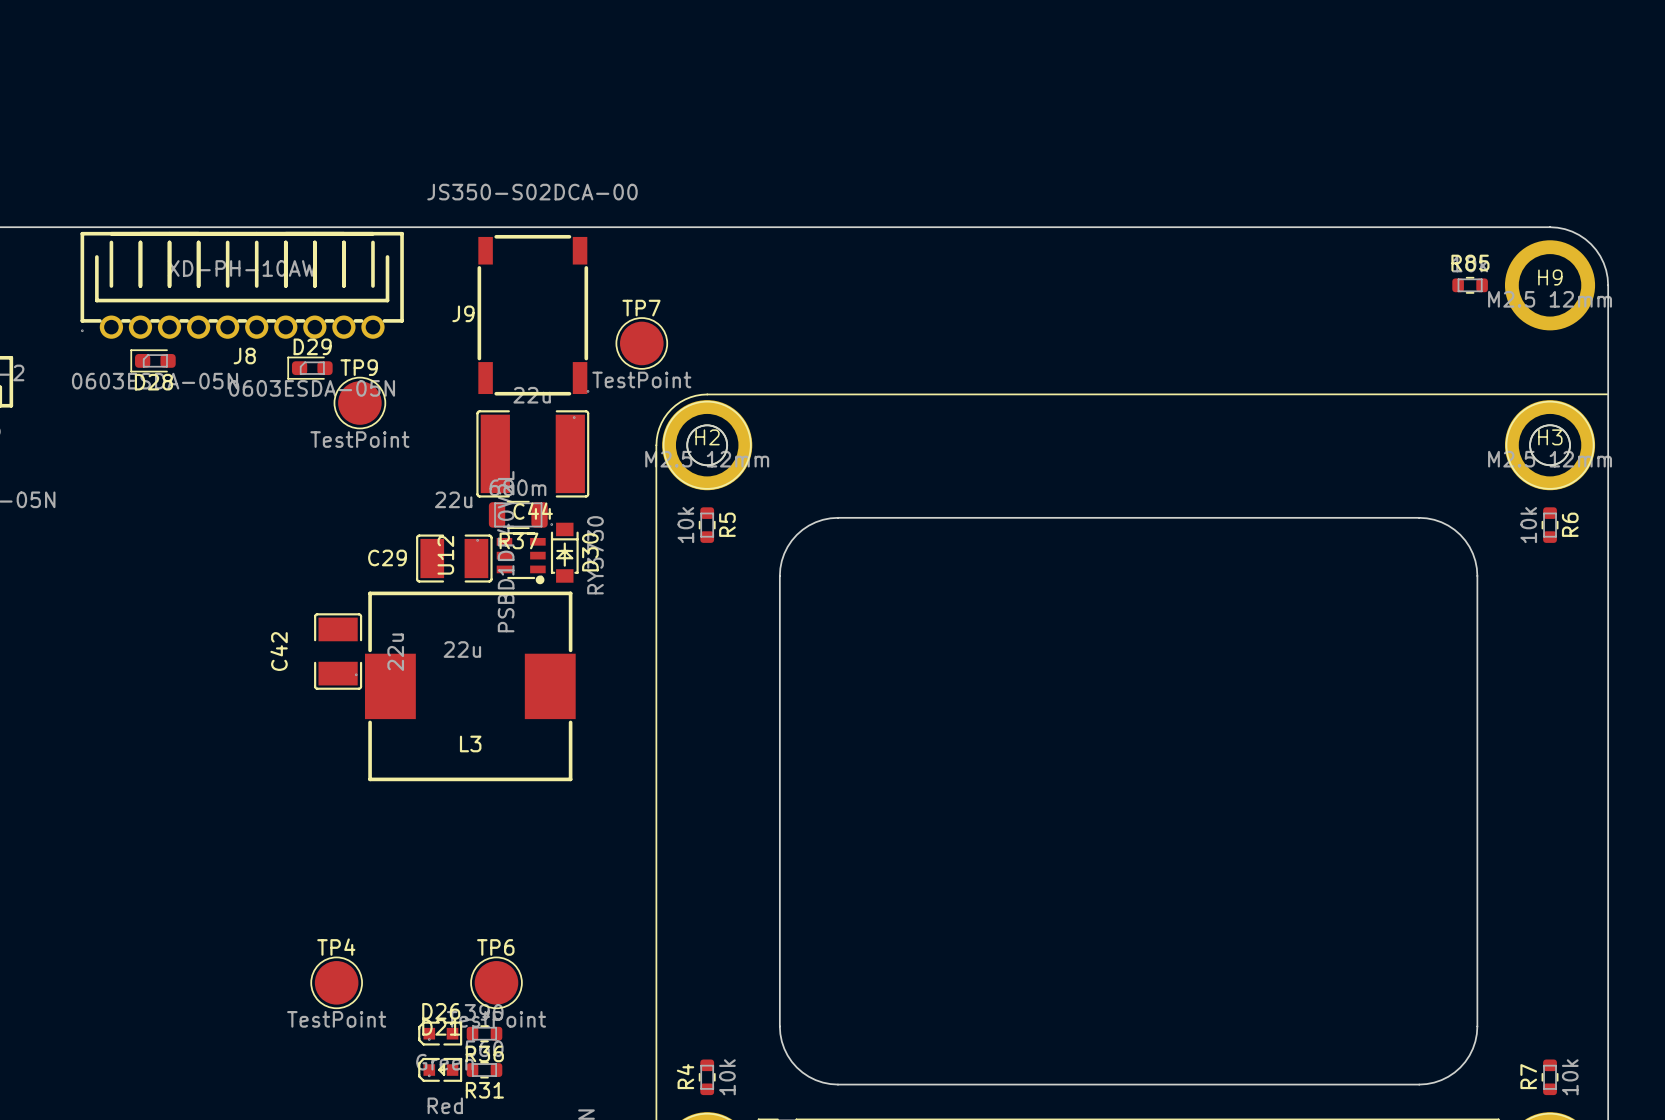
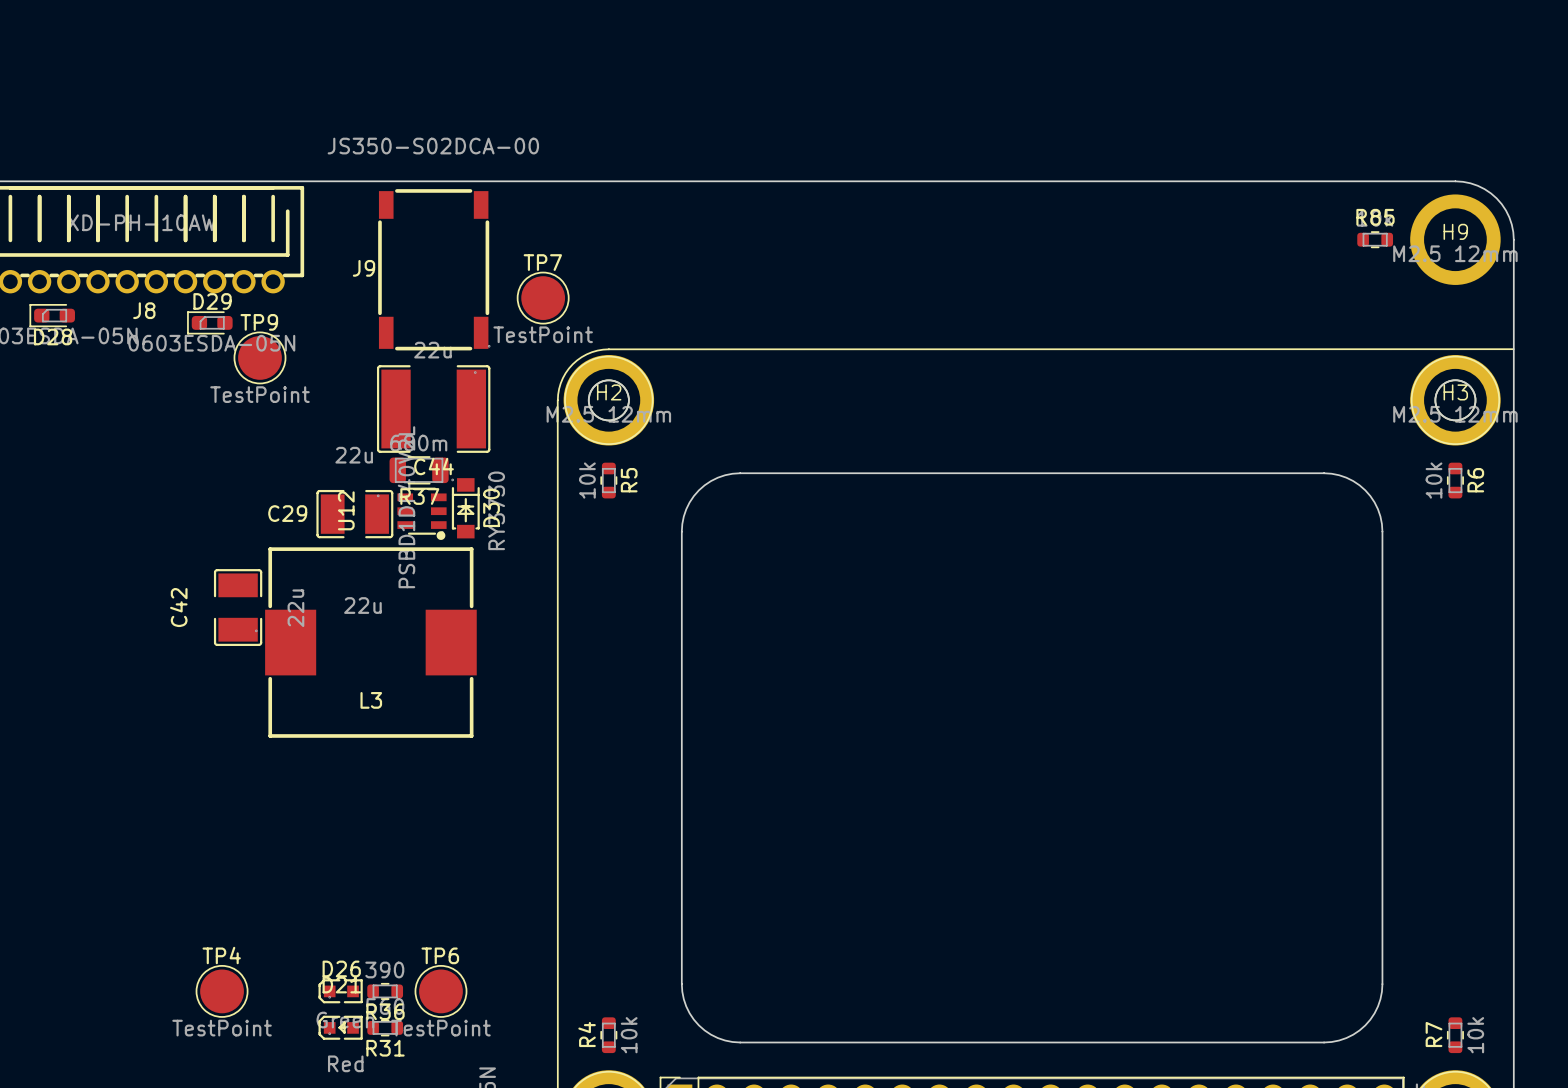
TP4 position: (336, 982) -> (222, 991)
TP6 position: (496, 982) -> (440, 991)

